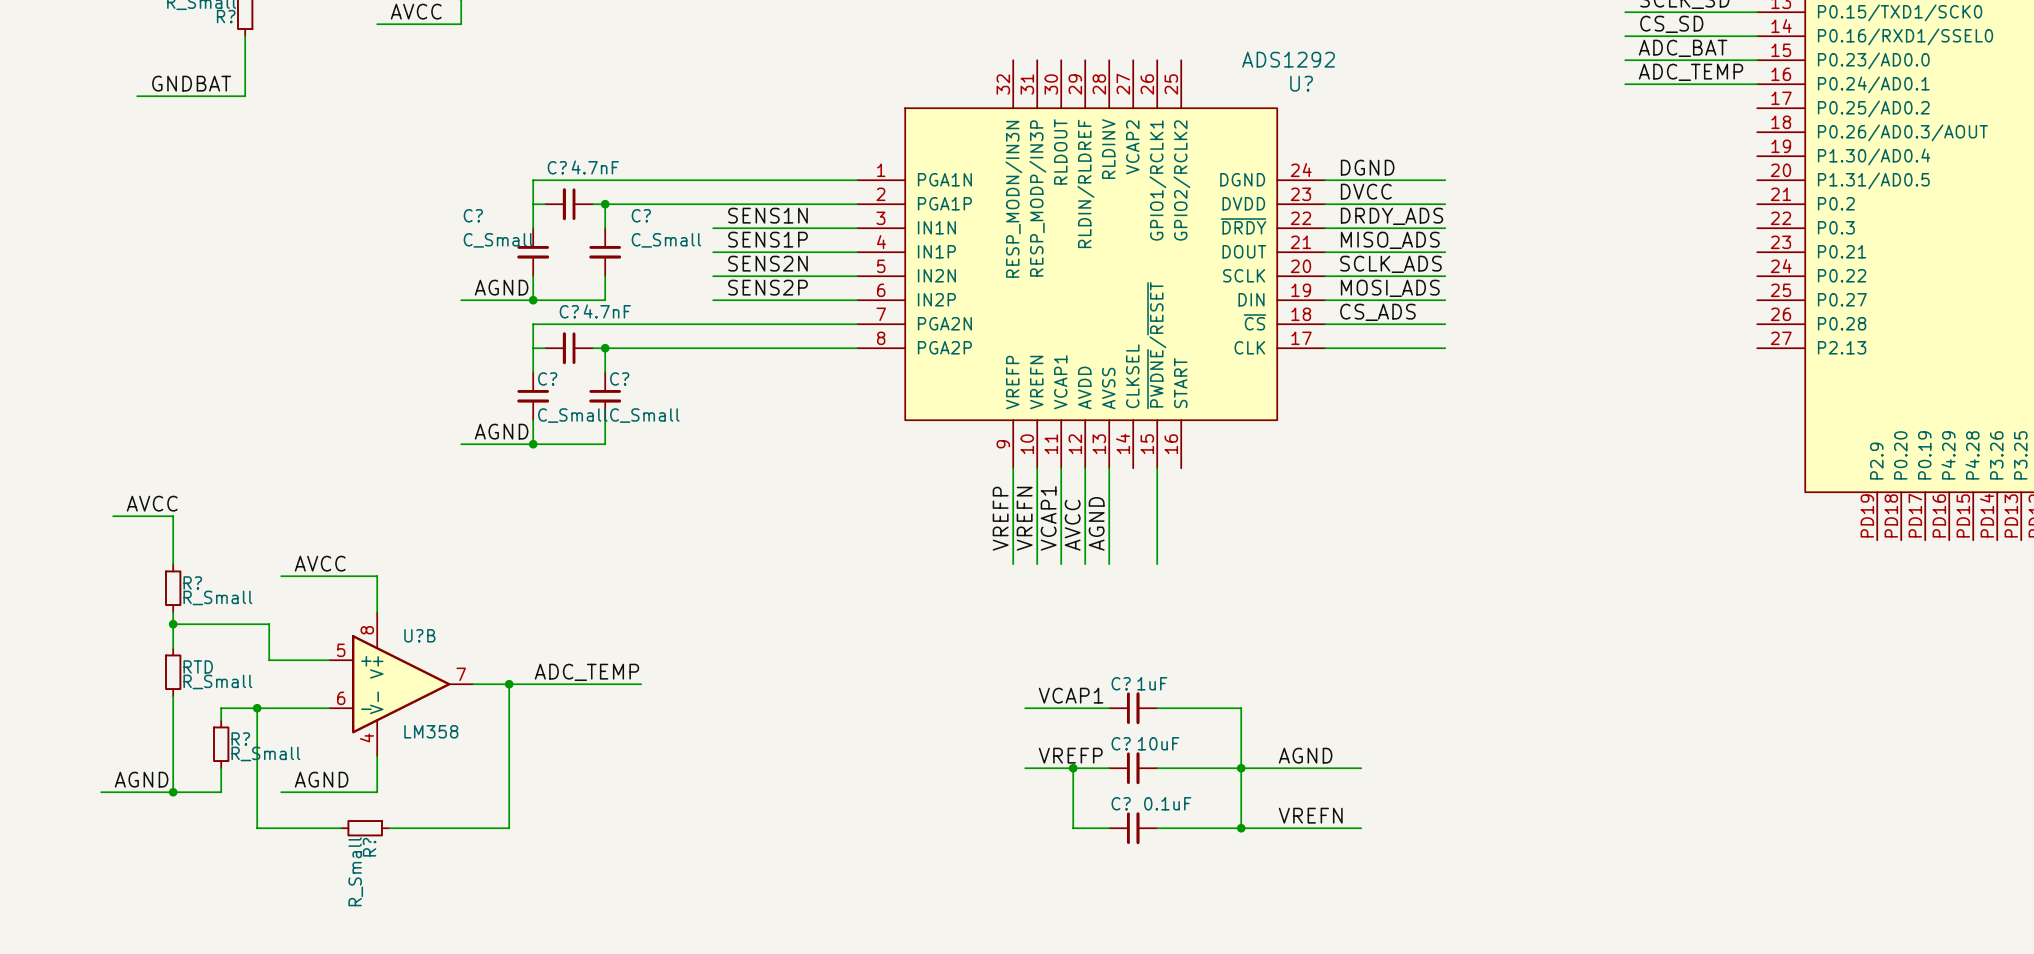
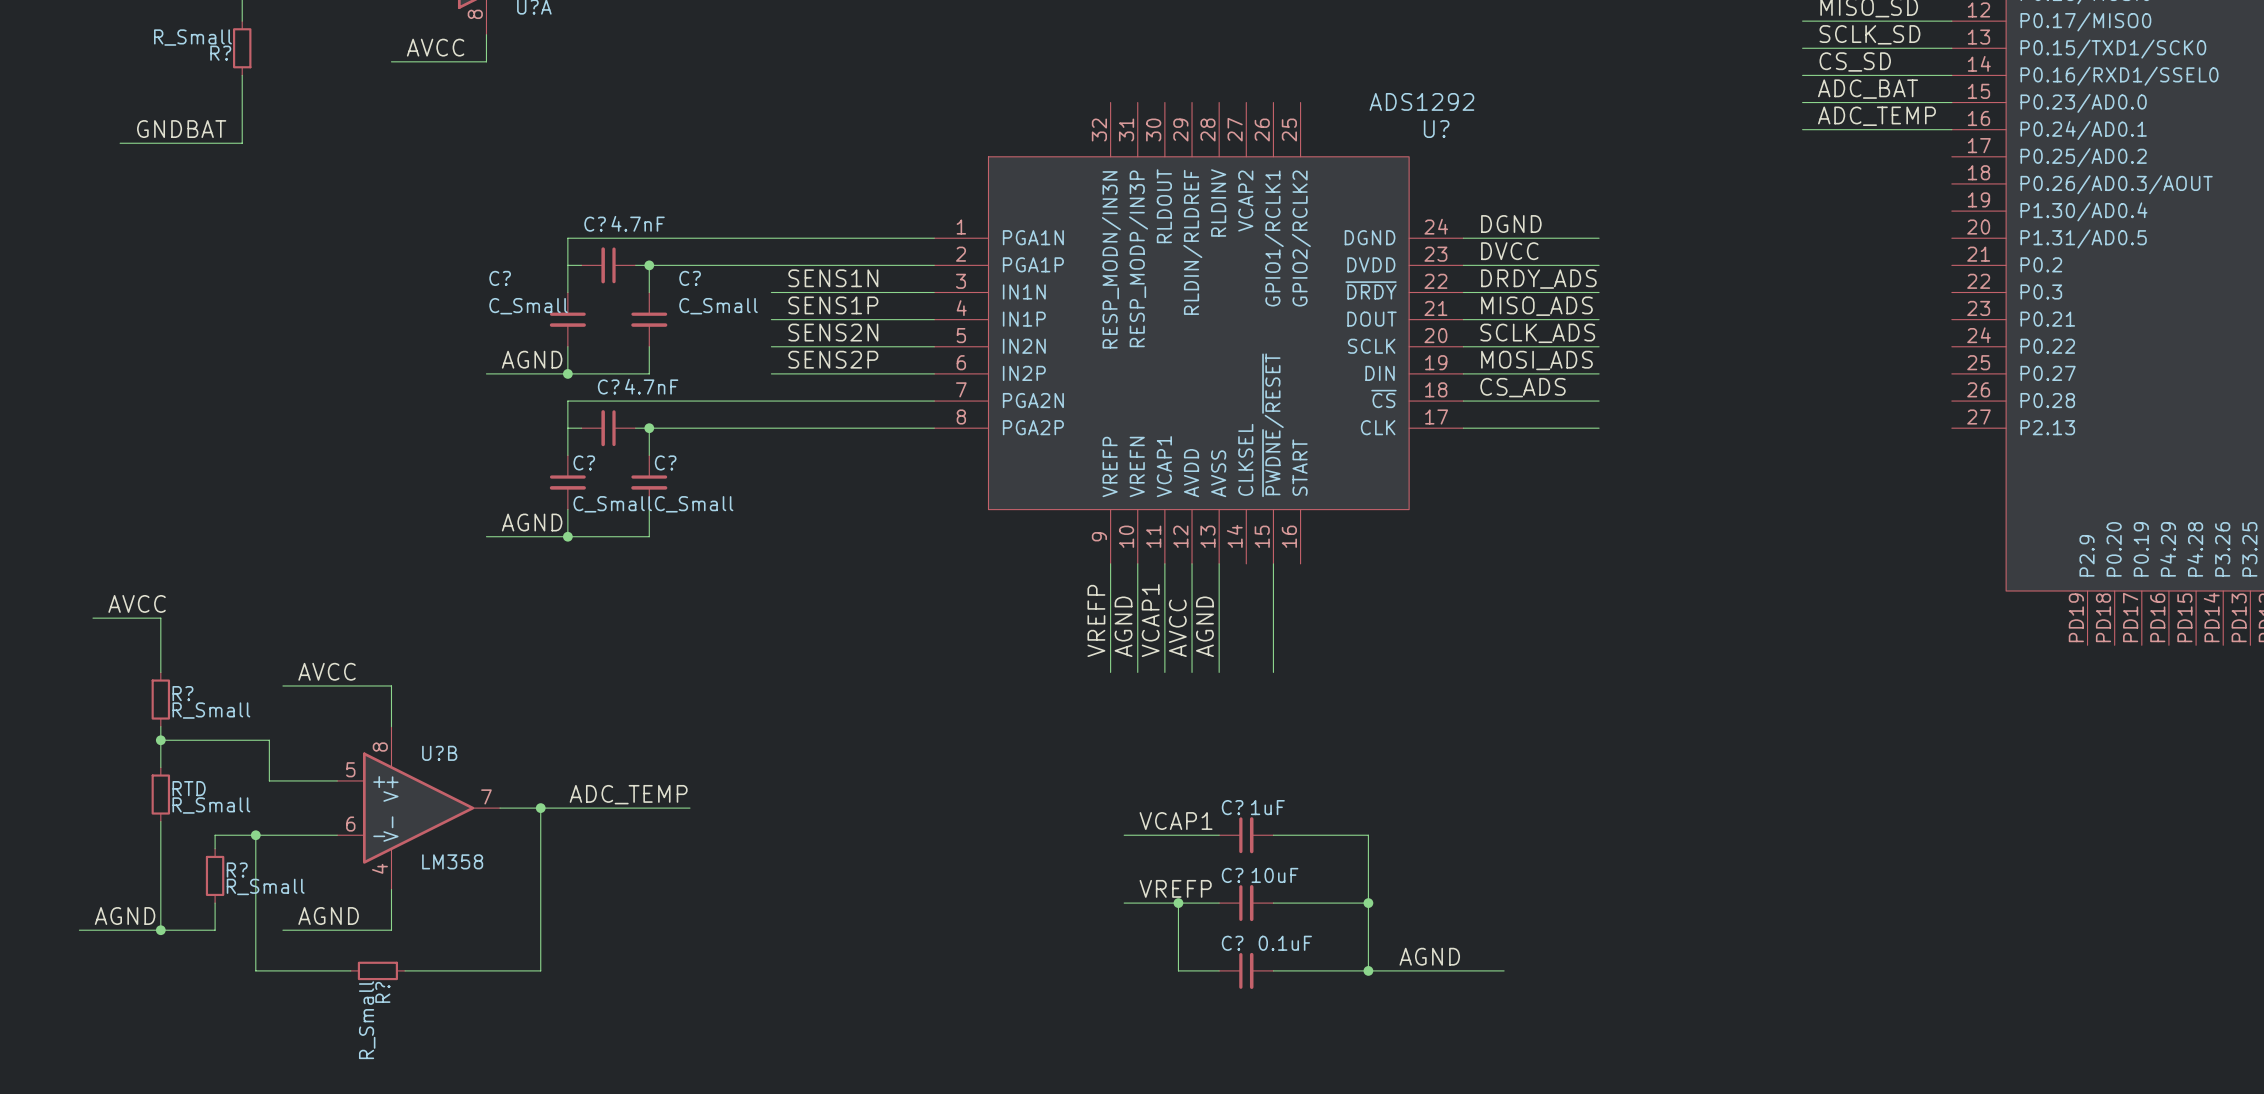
label: VREFN (1024, 518) -> AGND (1123, 626)
label position: AGND (1305, 755) -> AGND (1429, 956)
wire: (1241, 768) (1361, 768) -> none
label: VREFN (1310, 815) -> none

